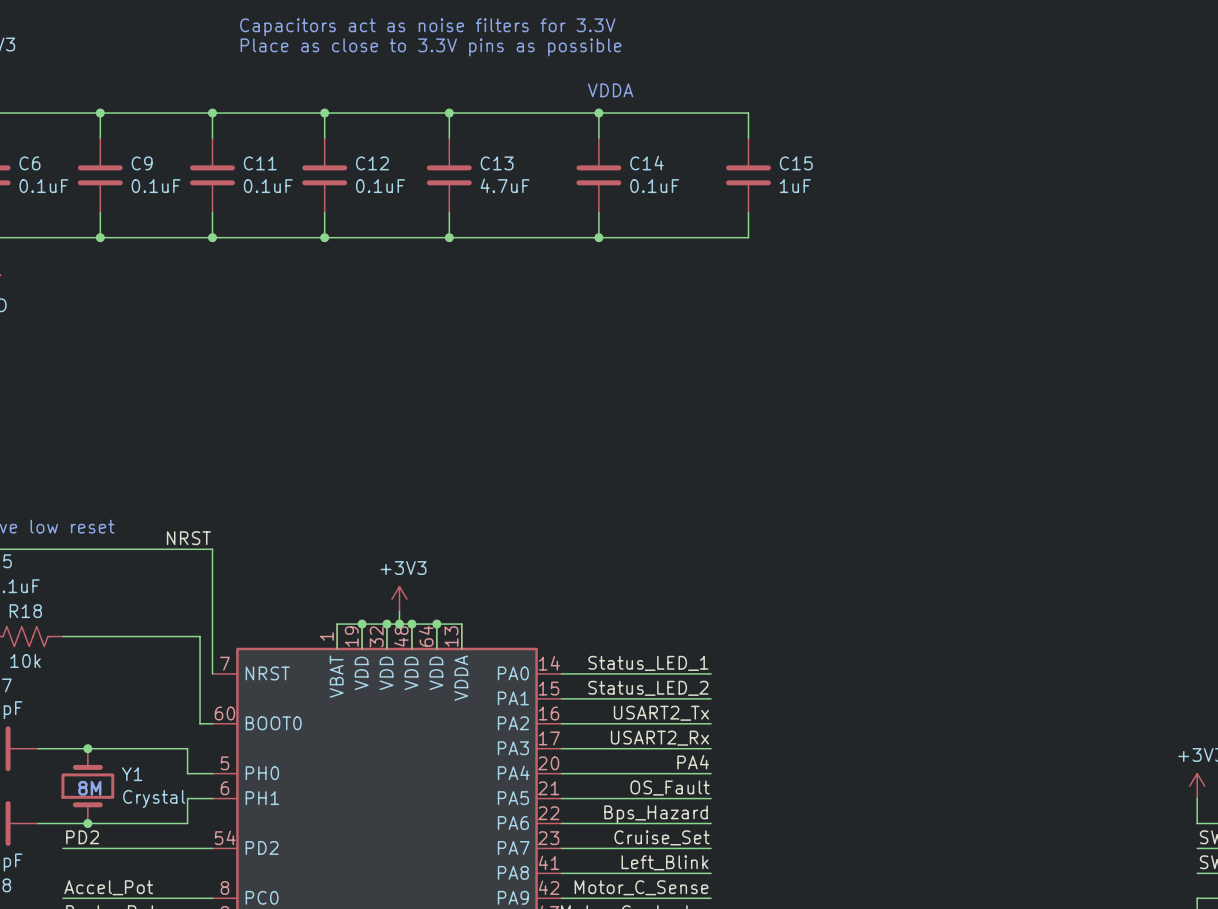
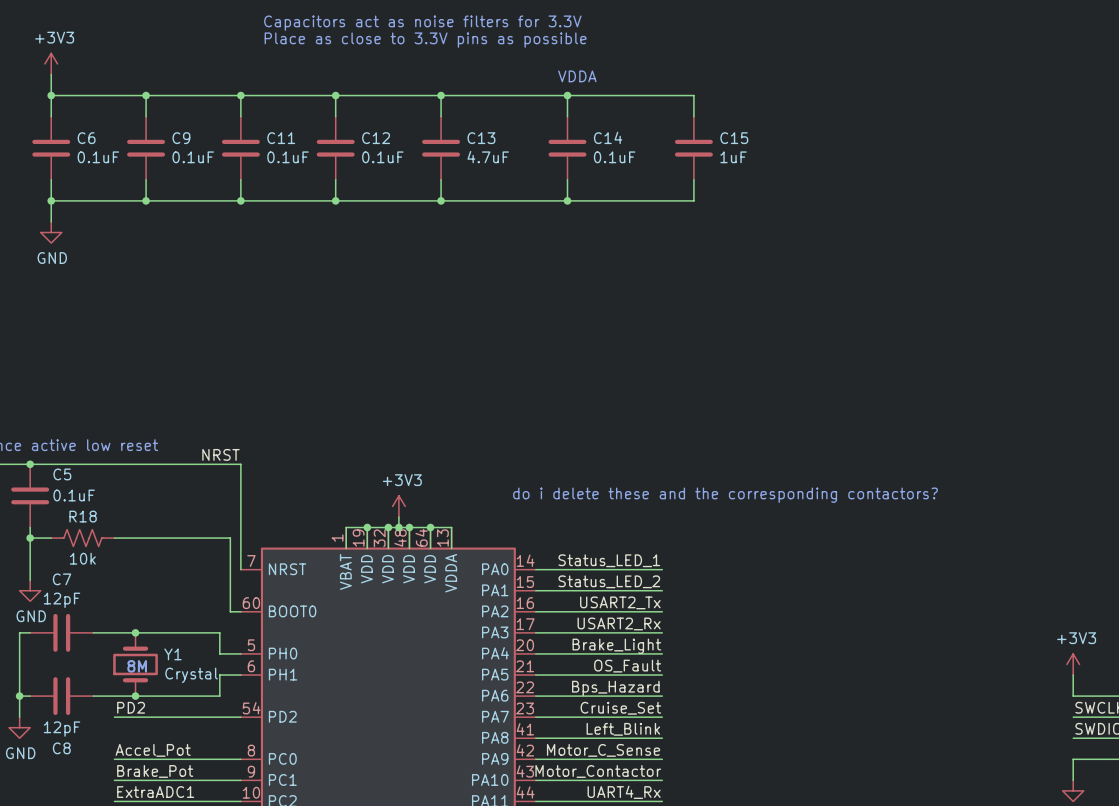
text: none -> do i delete these and the corresponding contactors? (725, 495)
label: PA4 (693, 762) -> Brake_Light (616, 646)

